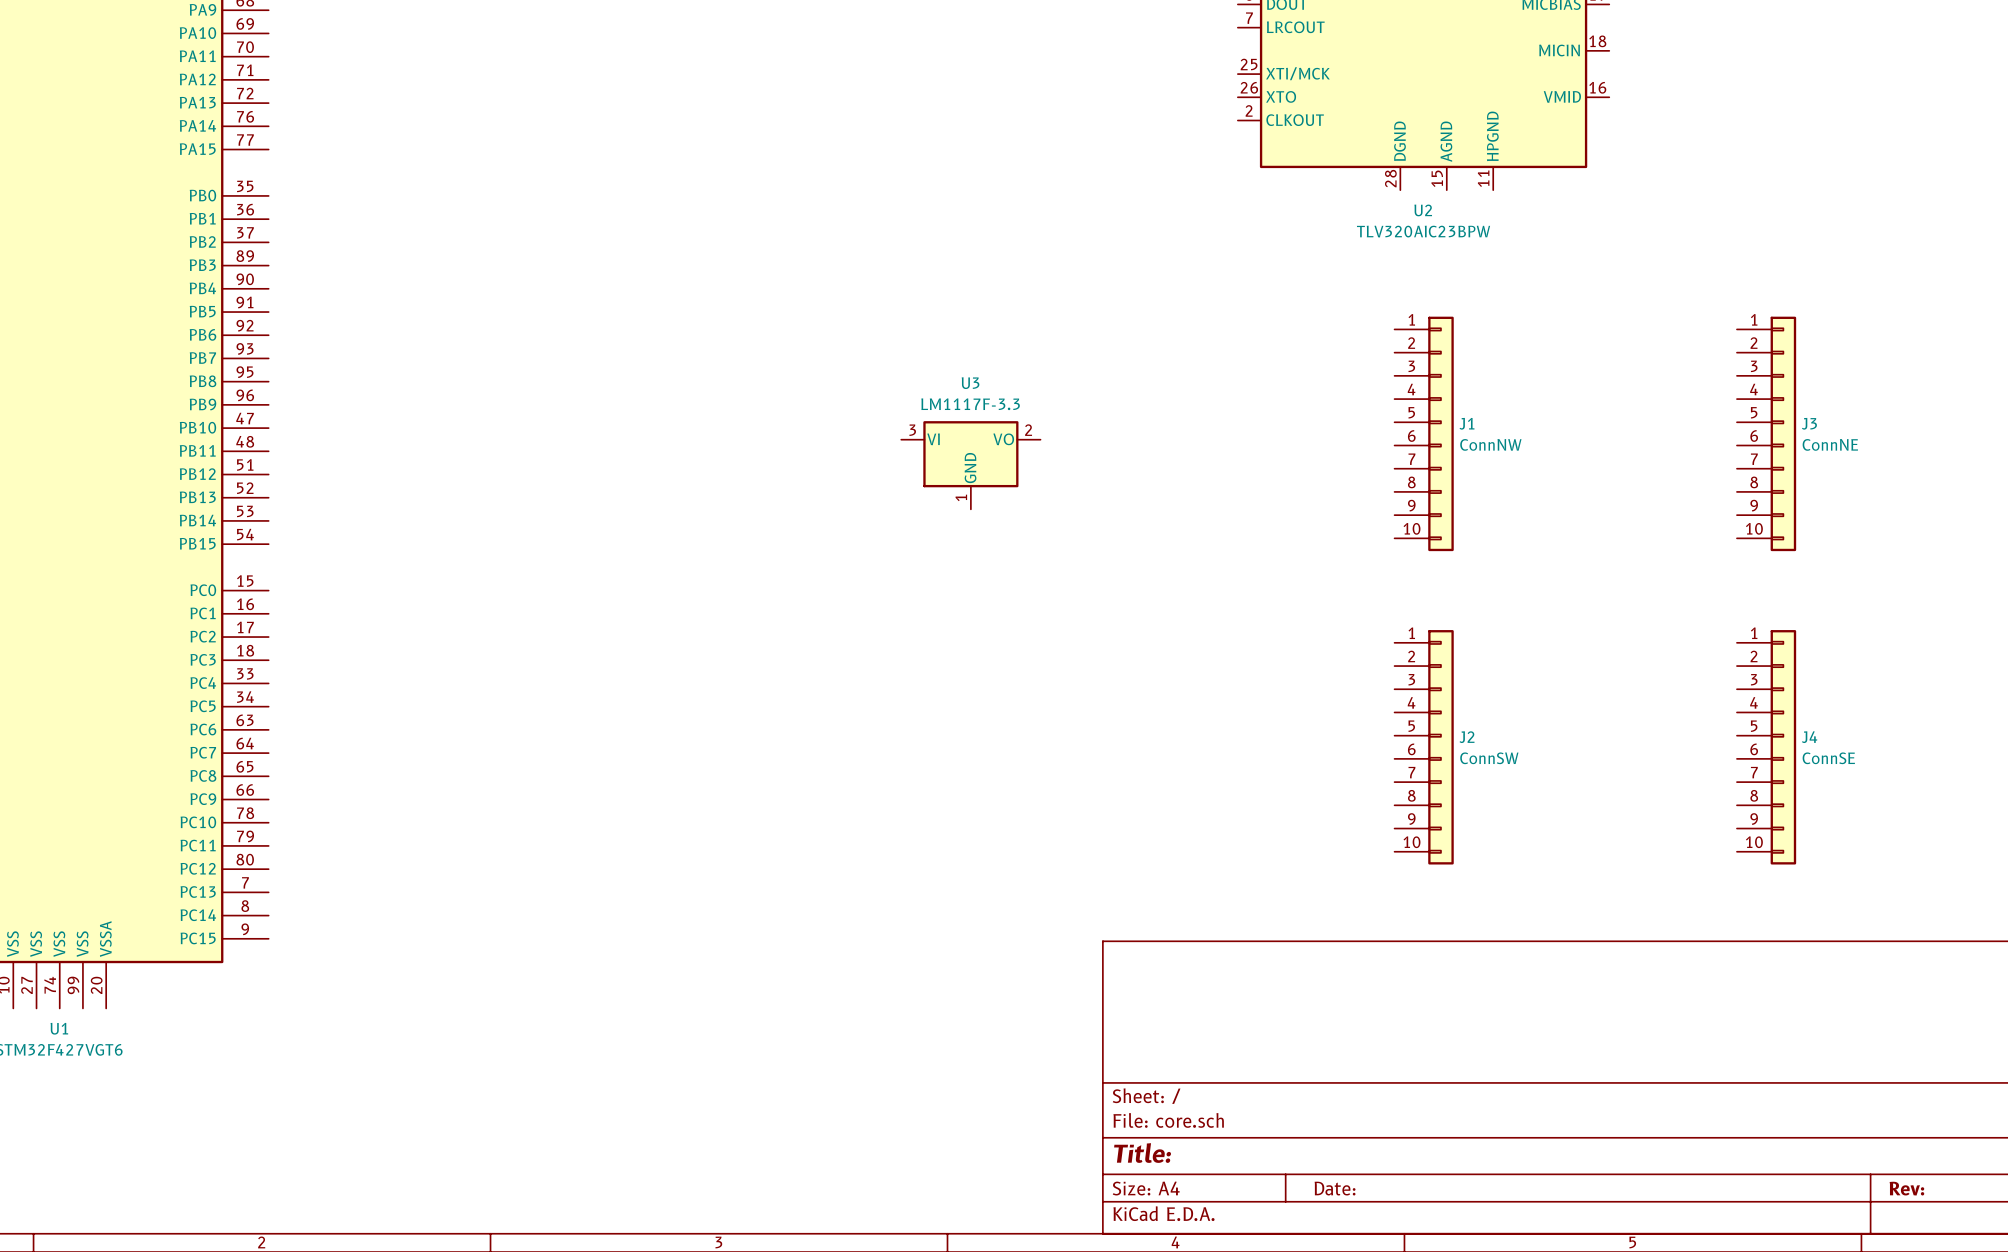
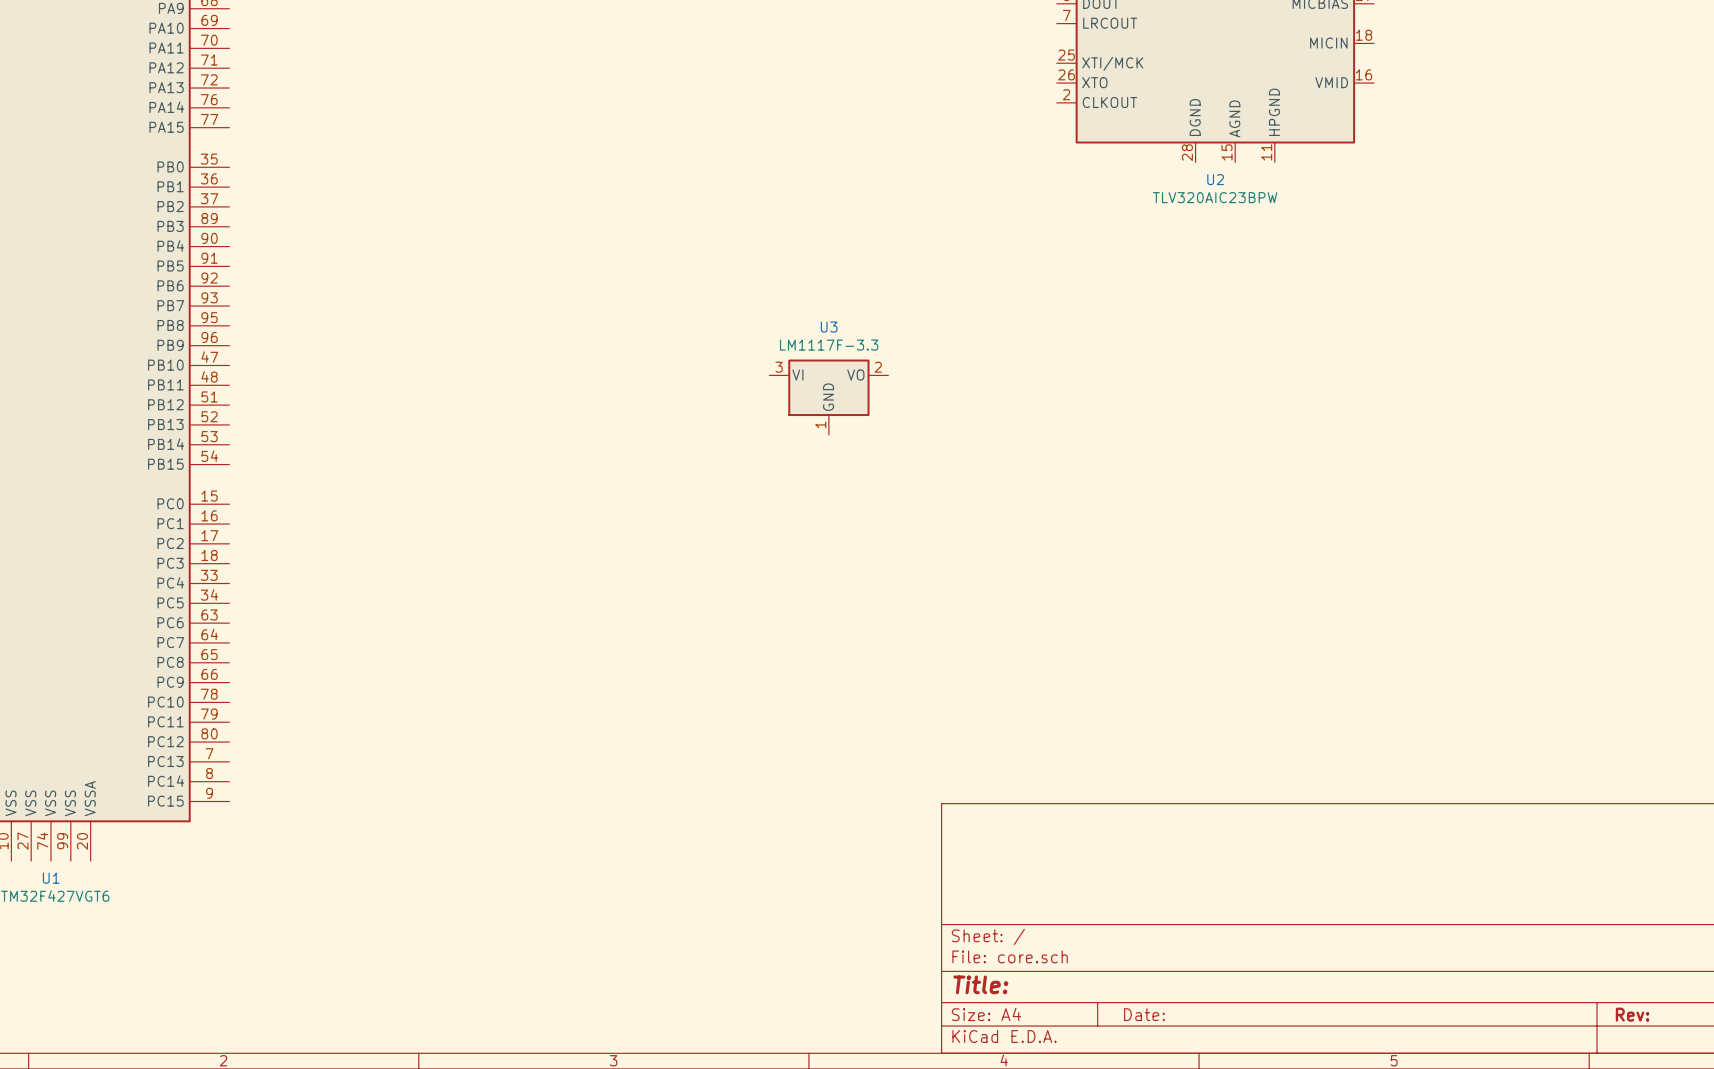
J1: ConnNW (1424, 433) -> none
J3: ConnNE (1766, 433) -> none
J2: ConnSW (1424, 747) -> none
J4: ConnSE (1766, 747) -> none

